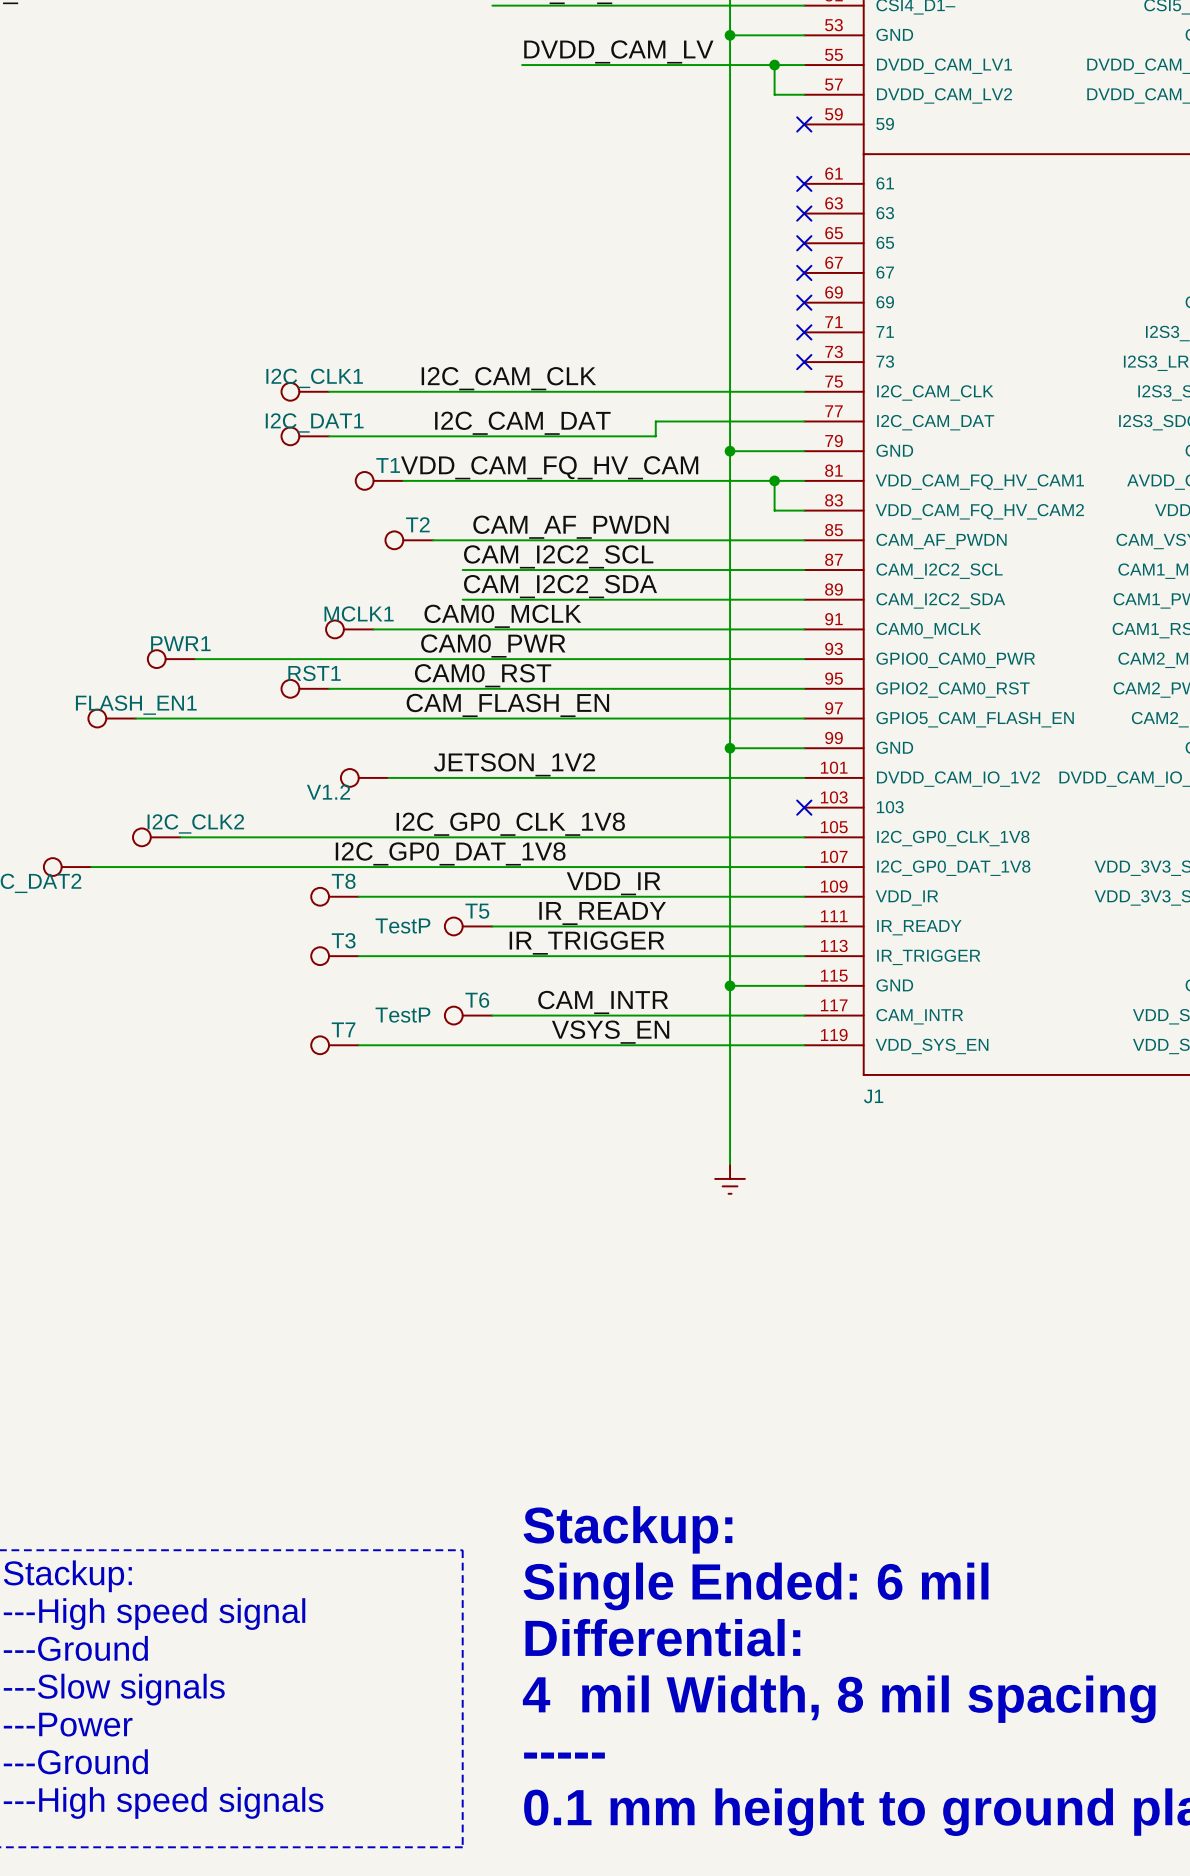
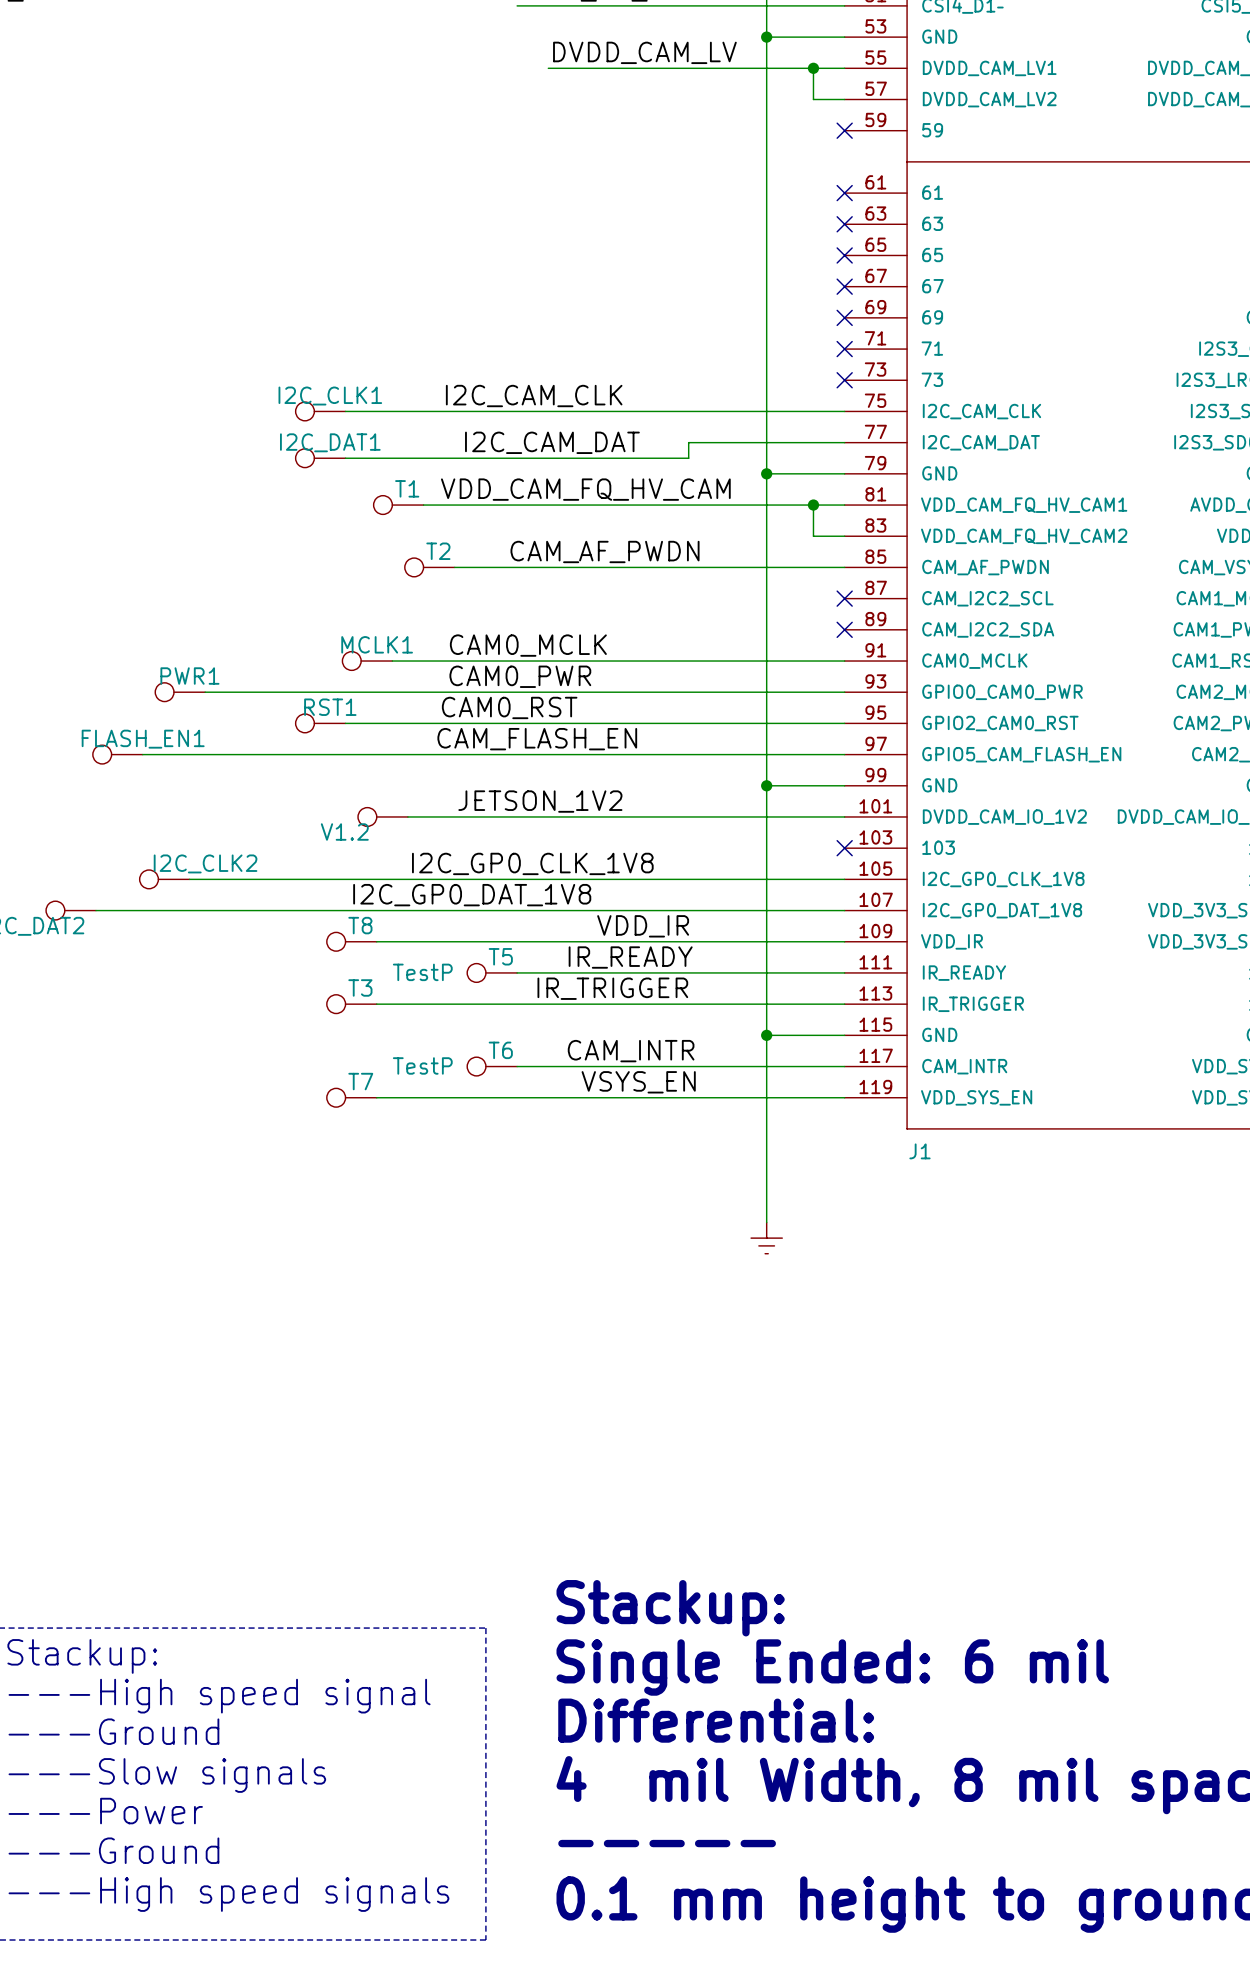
label: CAM_I2C2_SCL (558, 556) -> none
wire: (462, 570) (804, 570) -> none
no-connect mark: none -> (844, 598)
label: CAM_I2C2_SDA (560, 586) -> none
wire: (462, 599) (804, 599) -> none
no-connect mark: none -> (844, 629)

